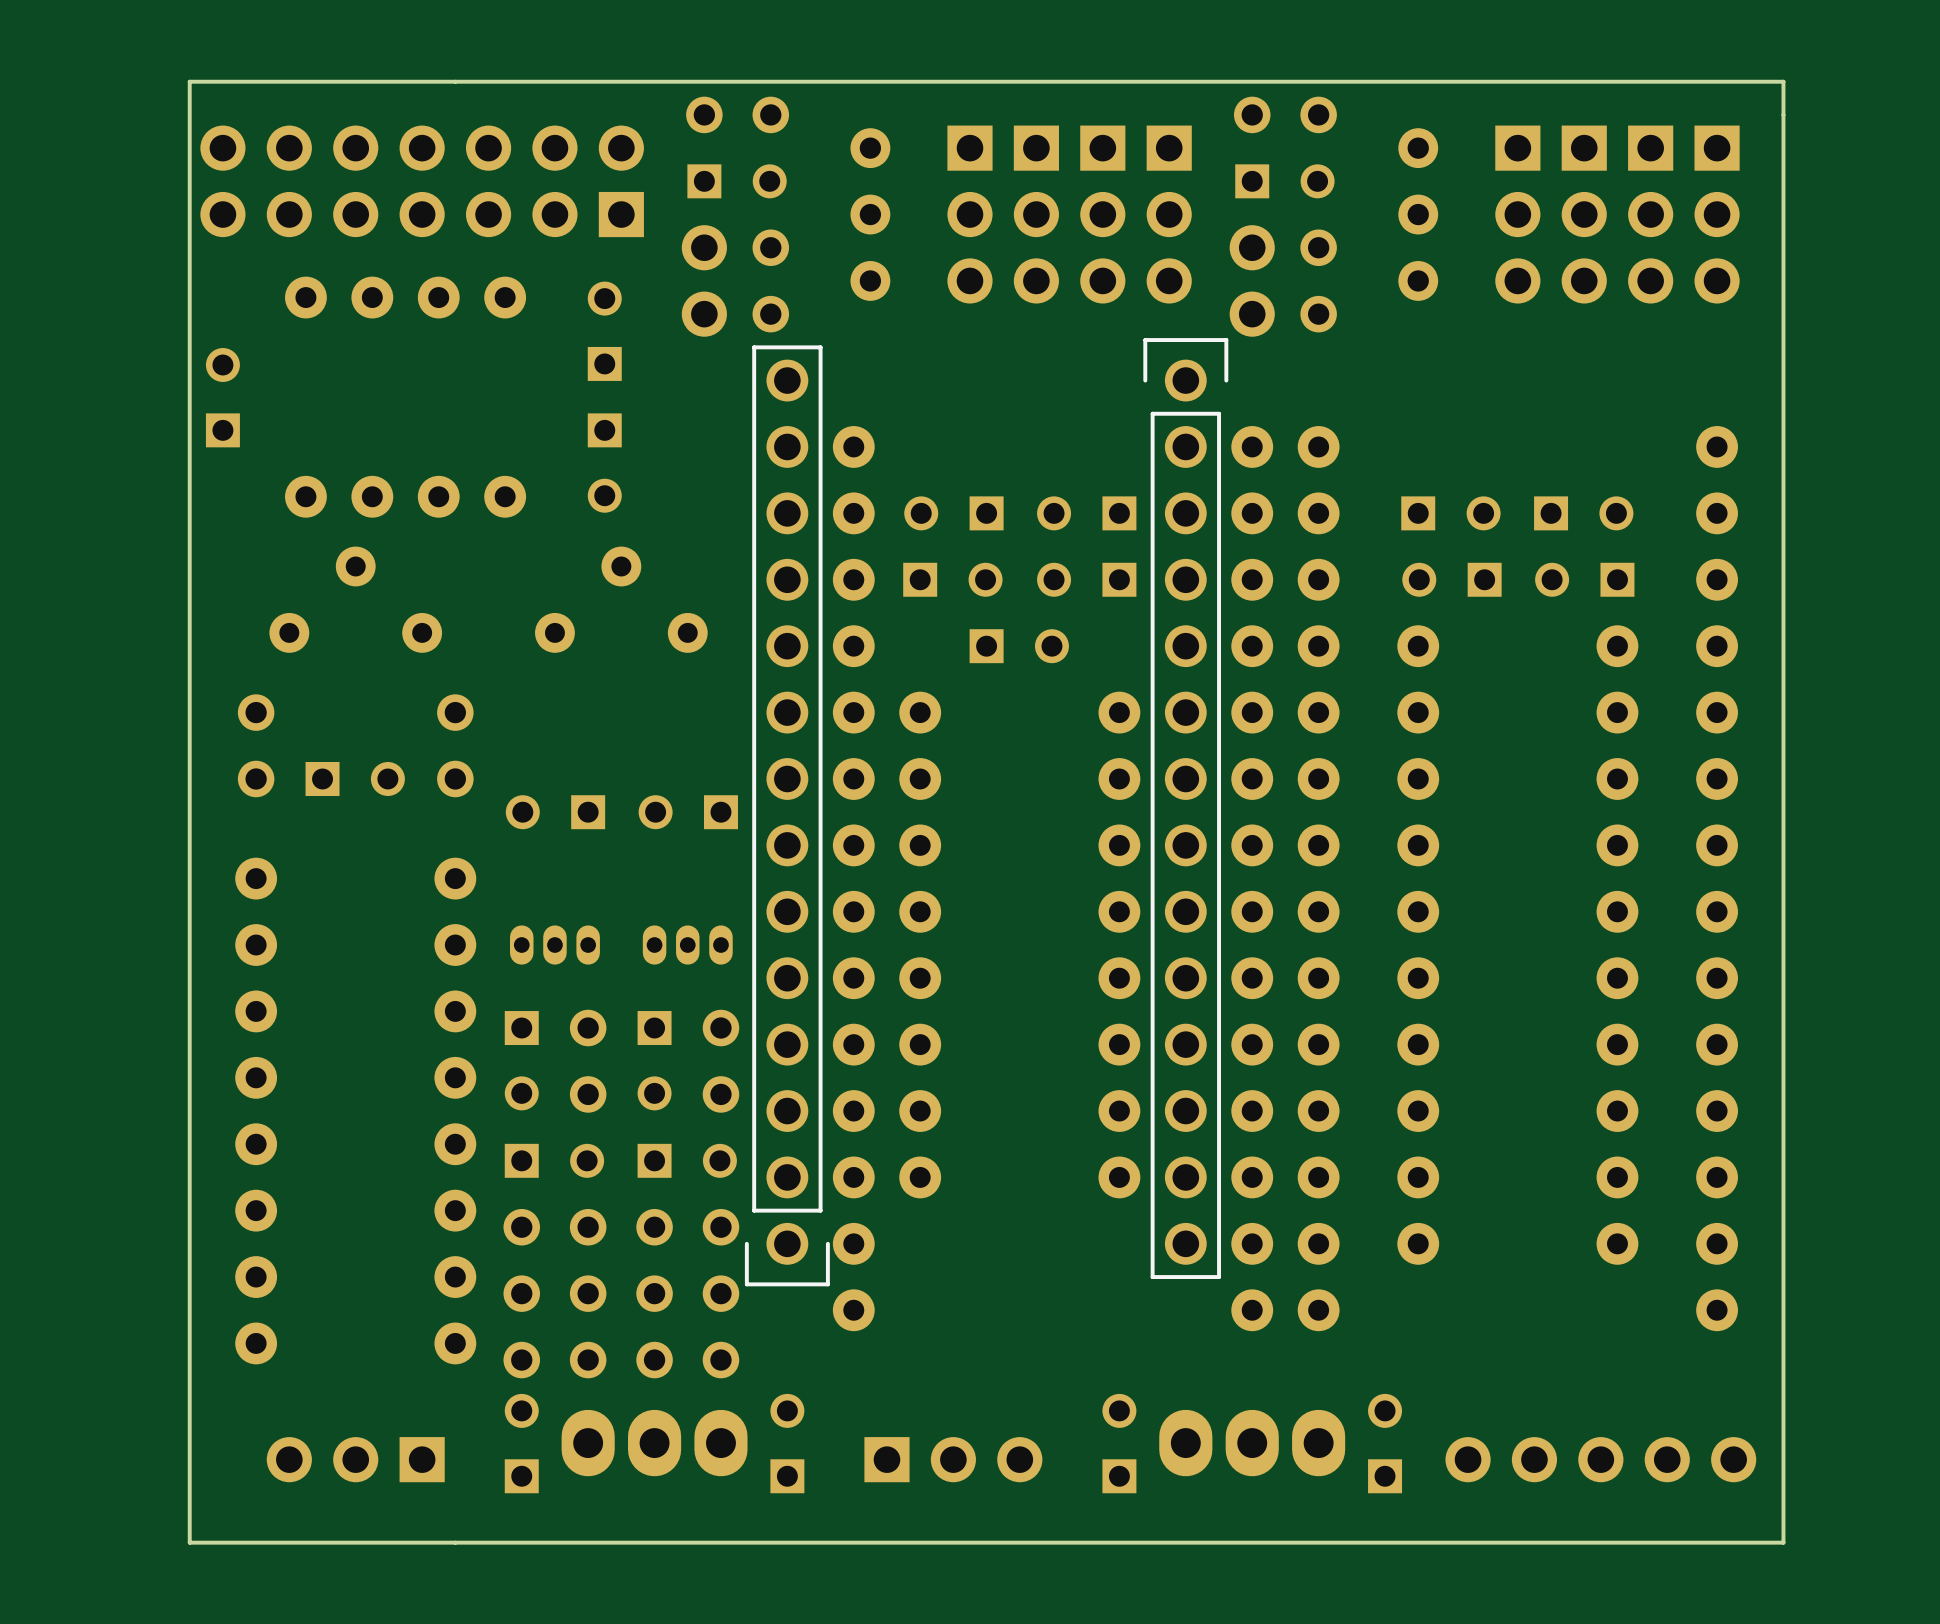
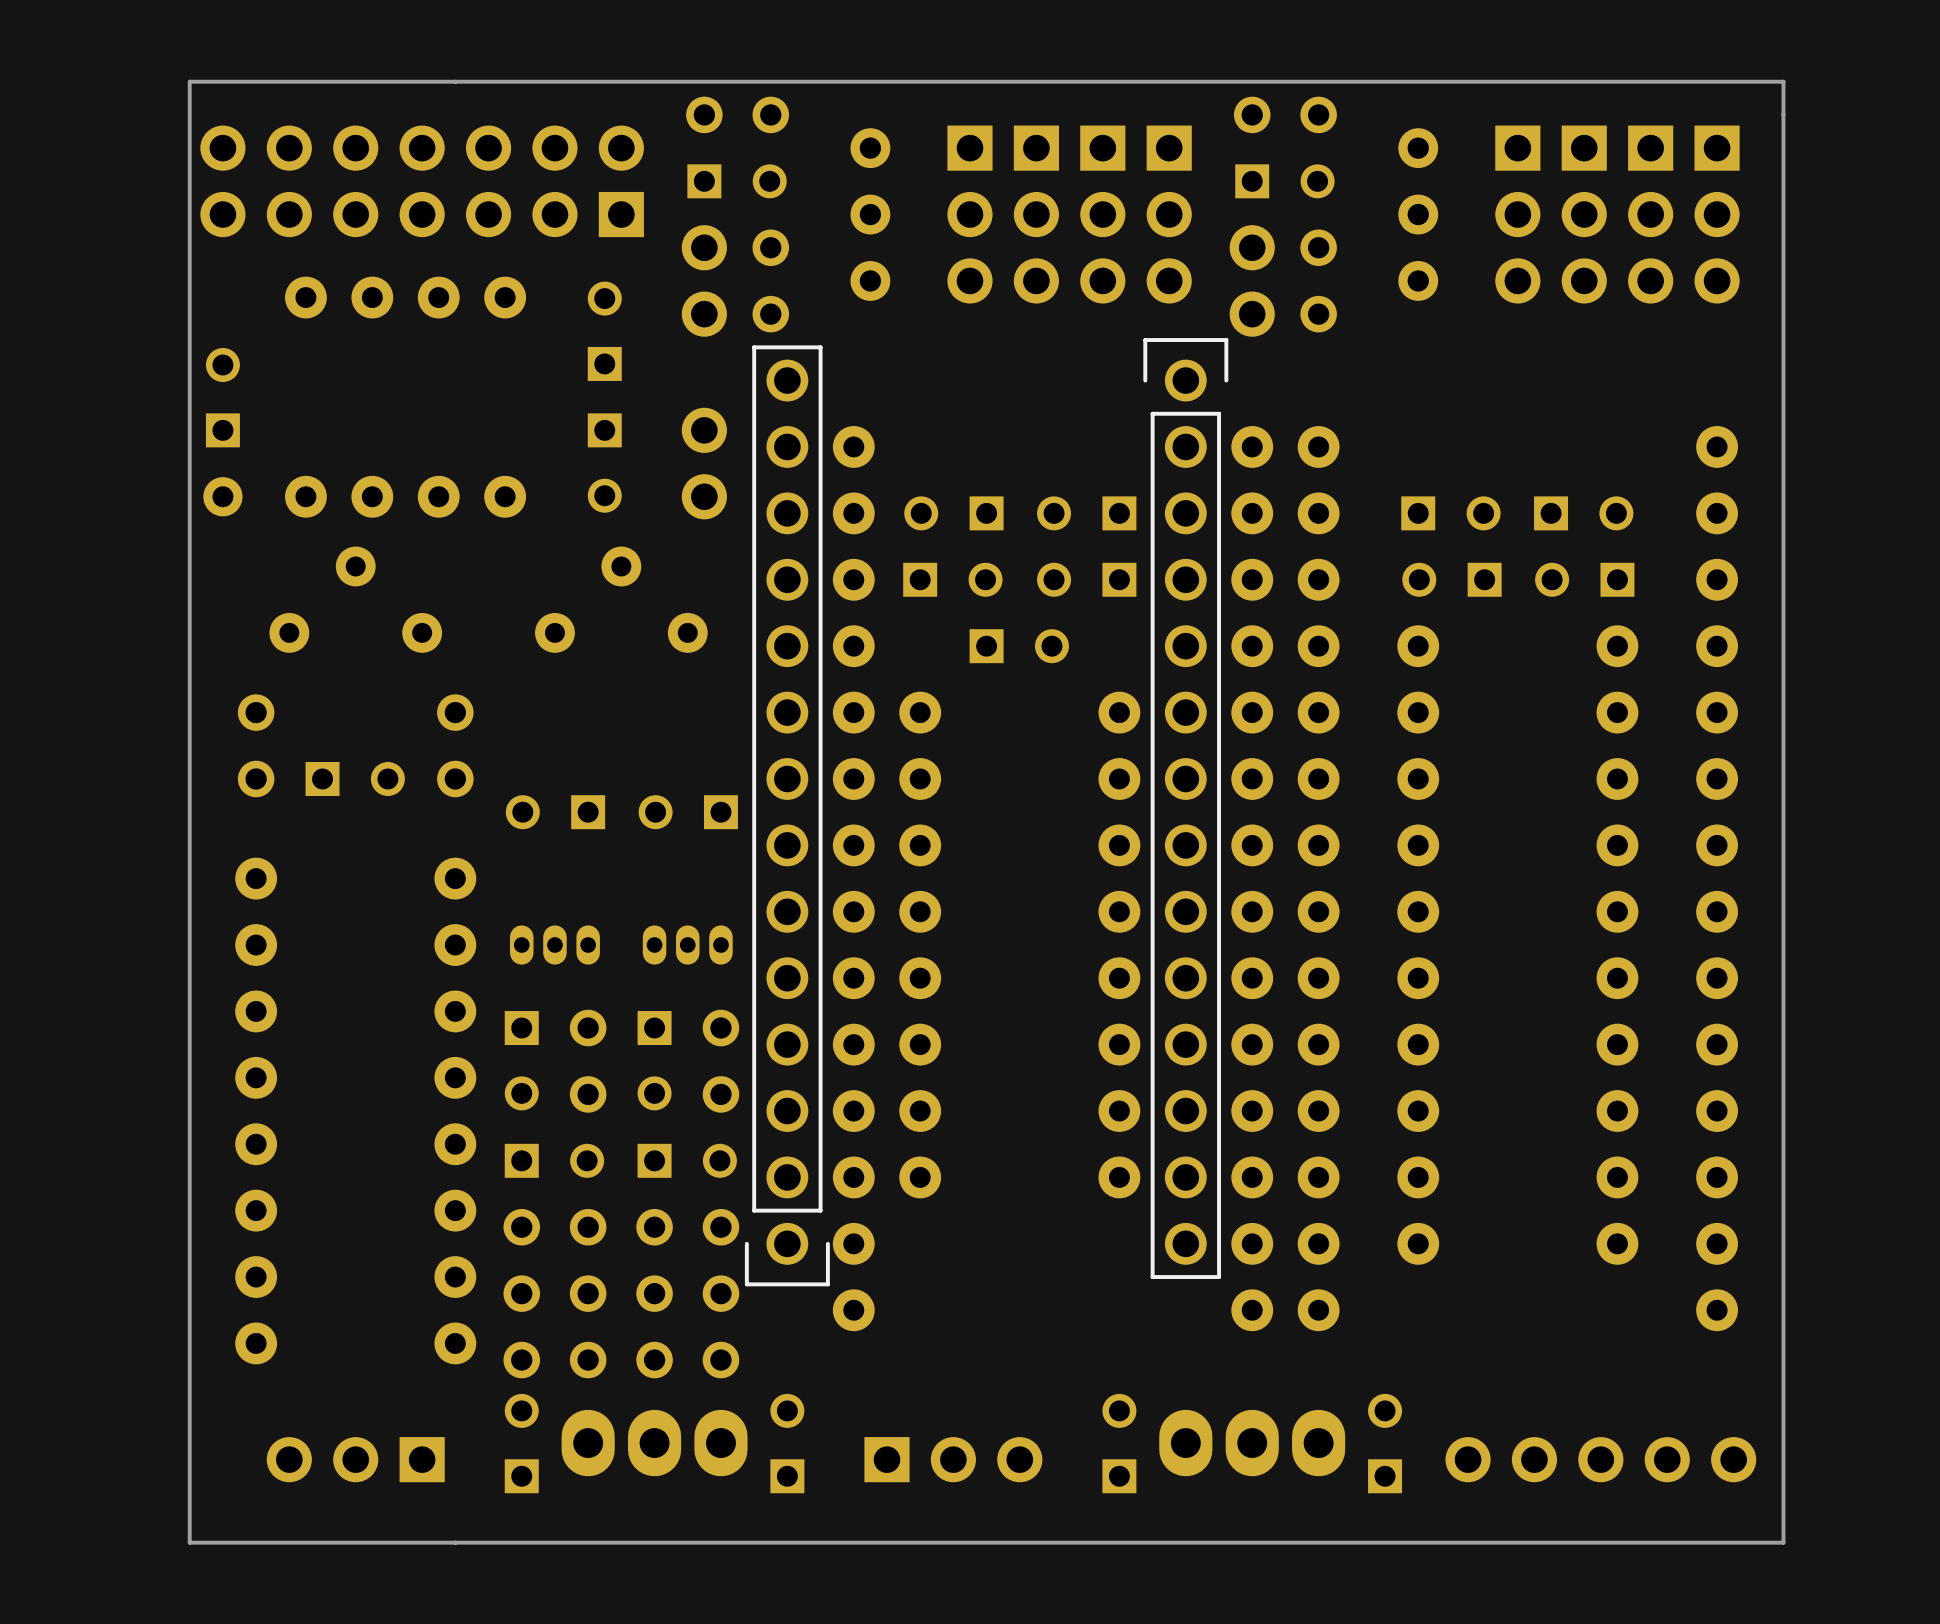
part: none -> (704, 463)
part: none -> (222, 496)

